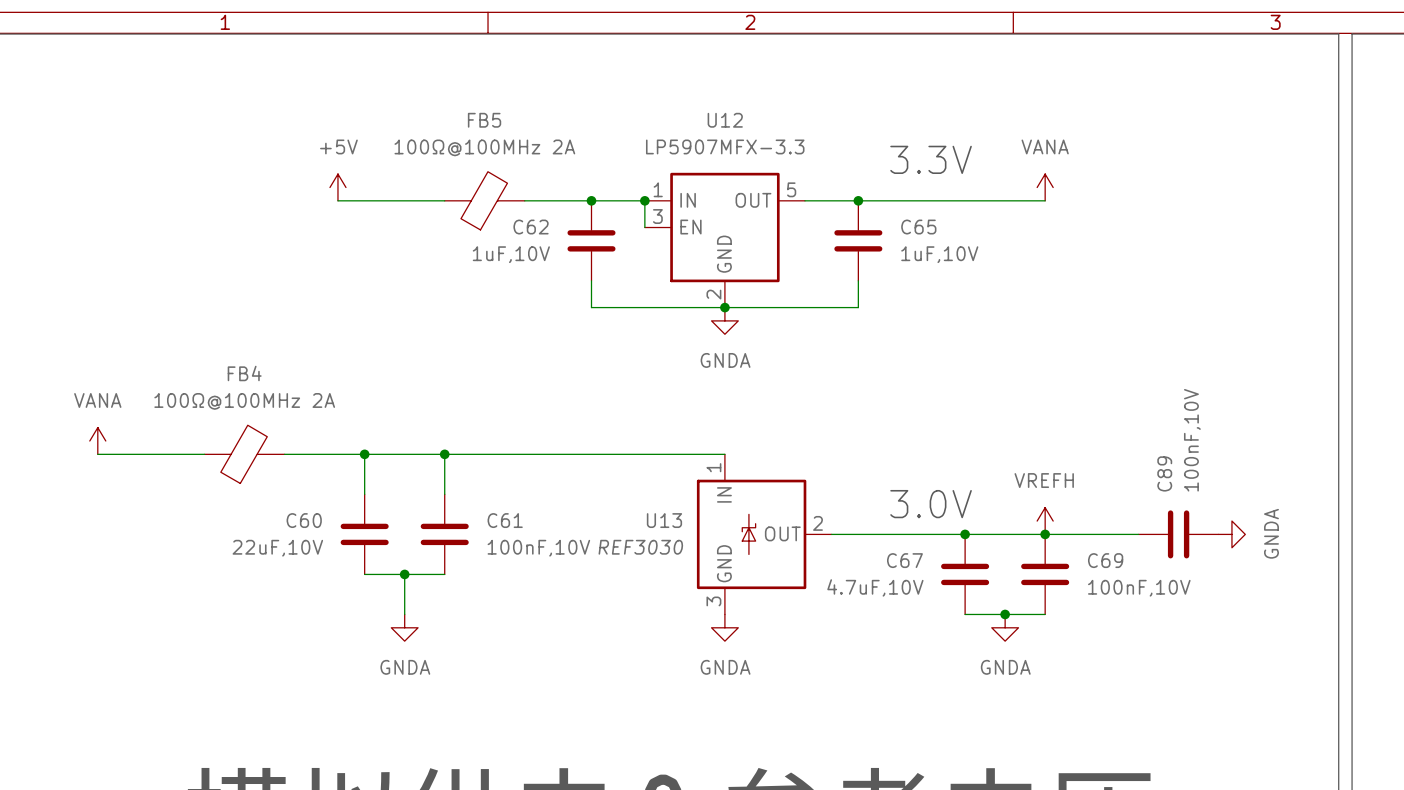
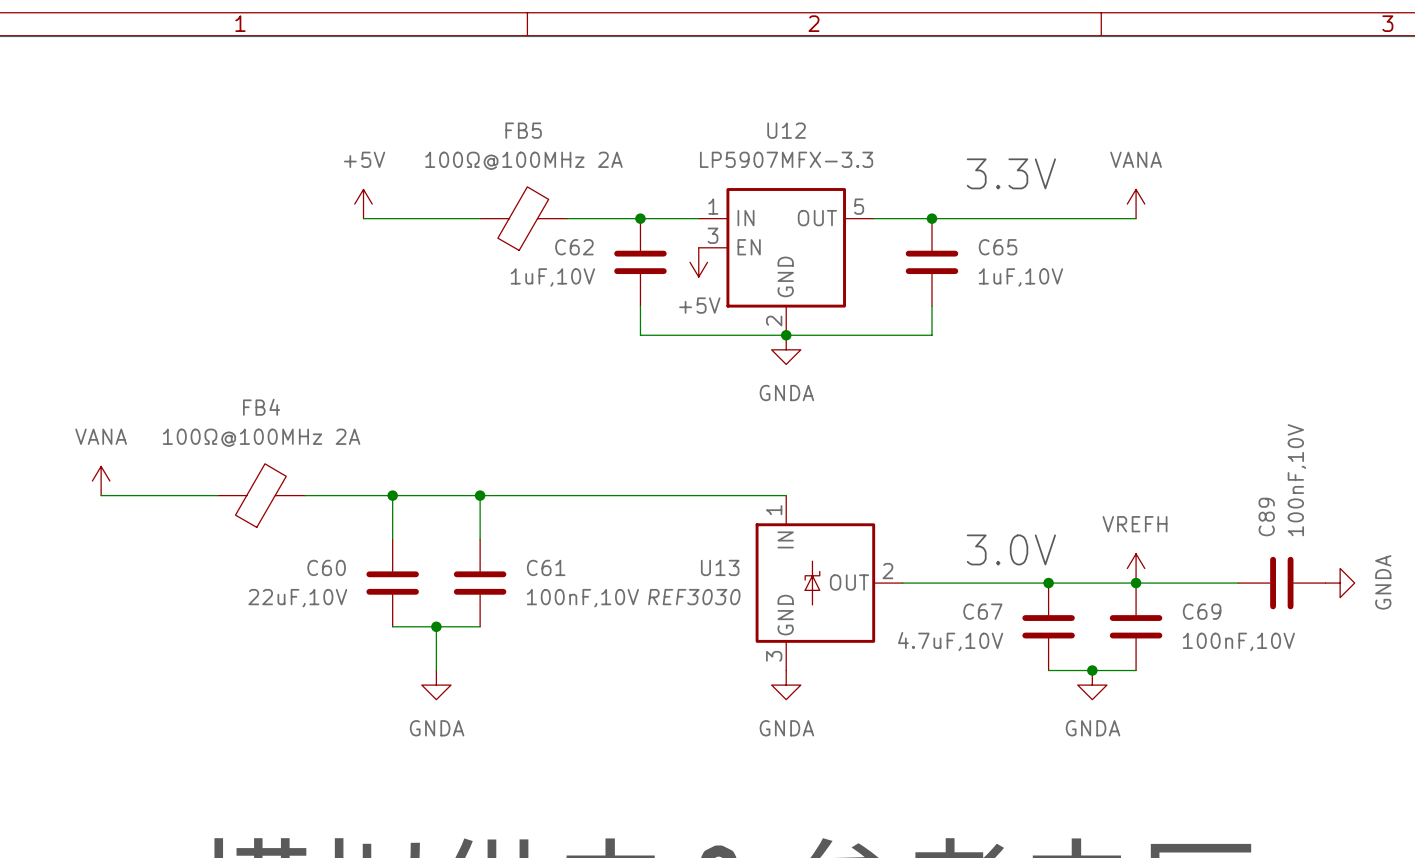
wire: (644, 200) (644, 227) -> none
junction: (644, 200) -> none
power symbol: none -> +5V (698, 262)

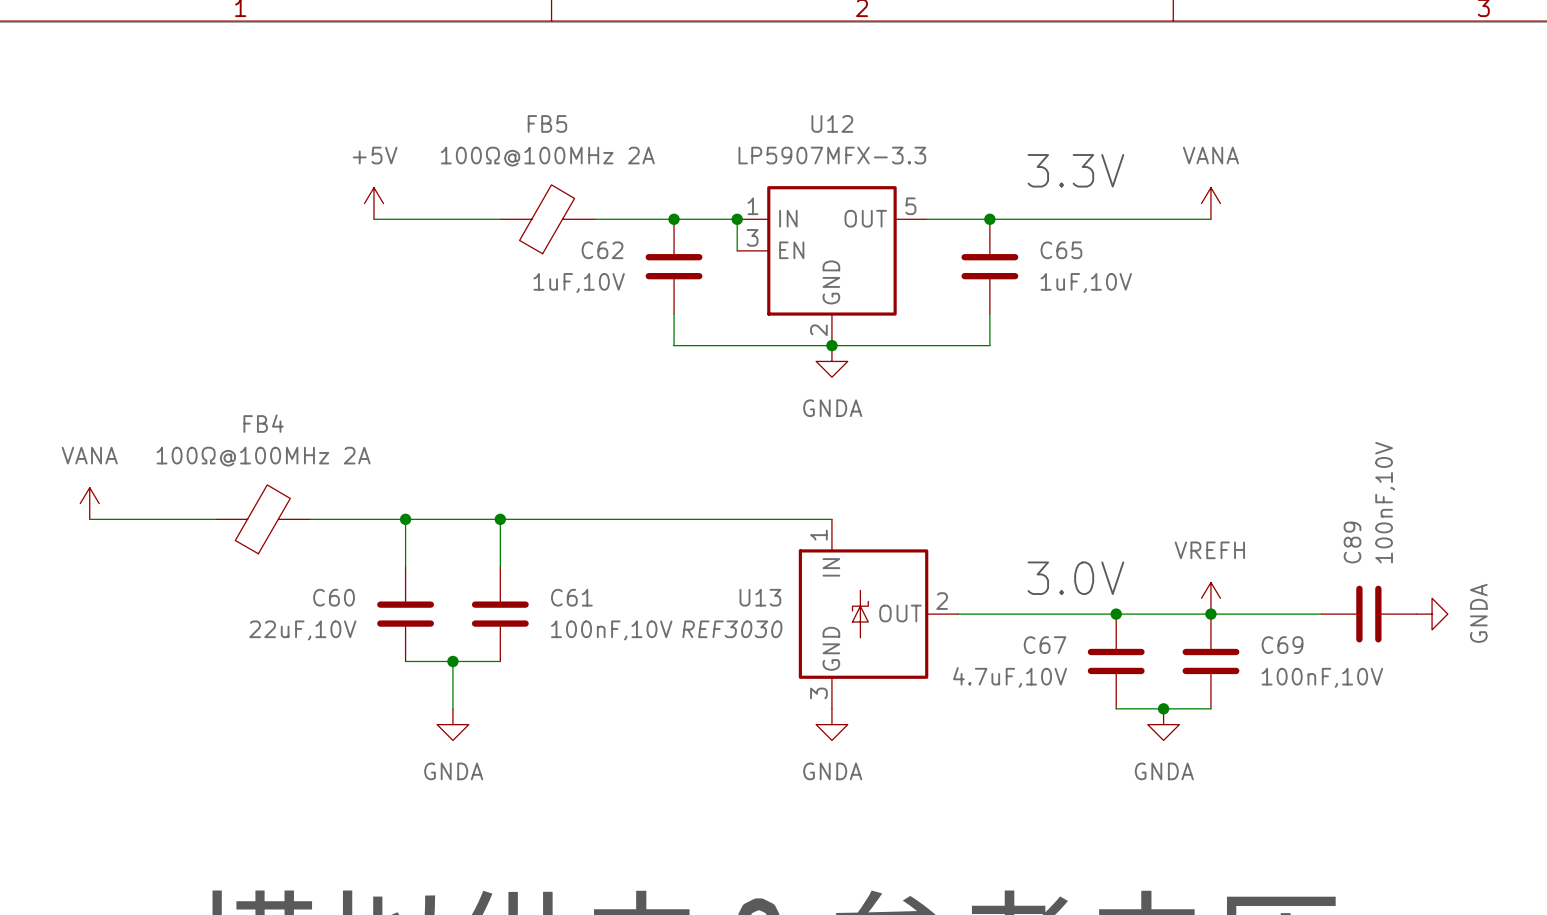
wire: none -> (737, 219) (737, 250)
junction: none -> (737, 219)
power symbol: +5V (698, 262) -> none

